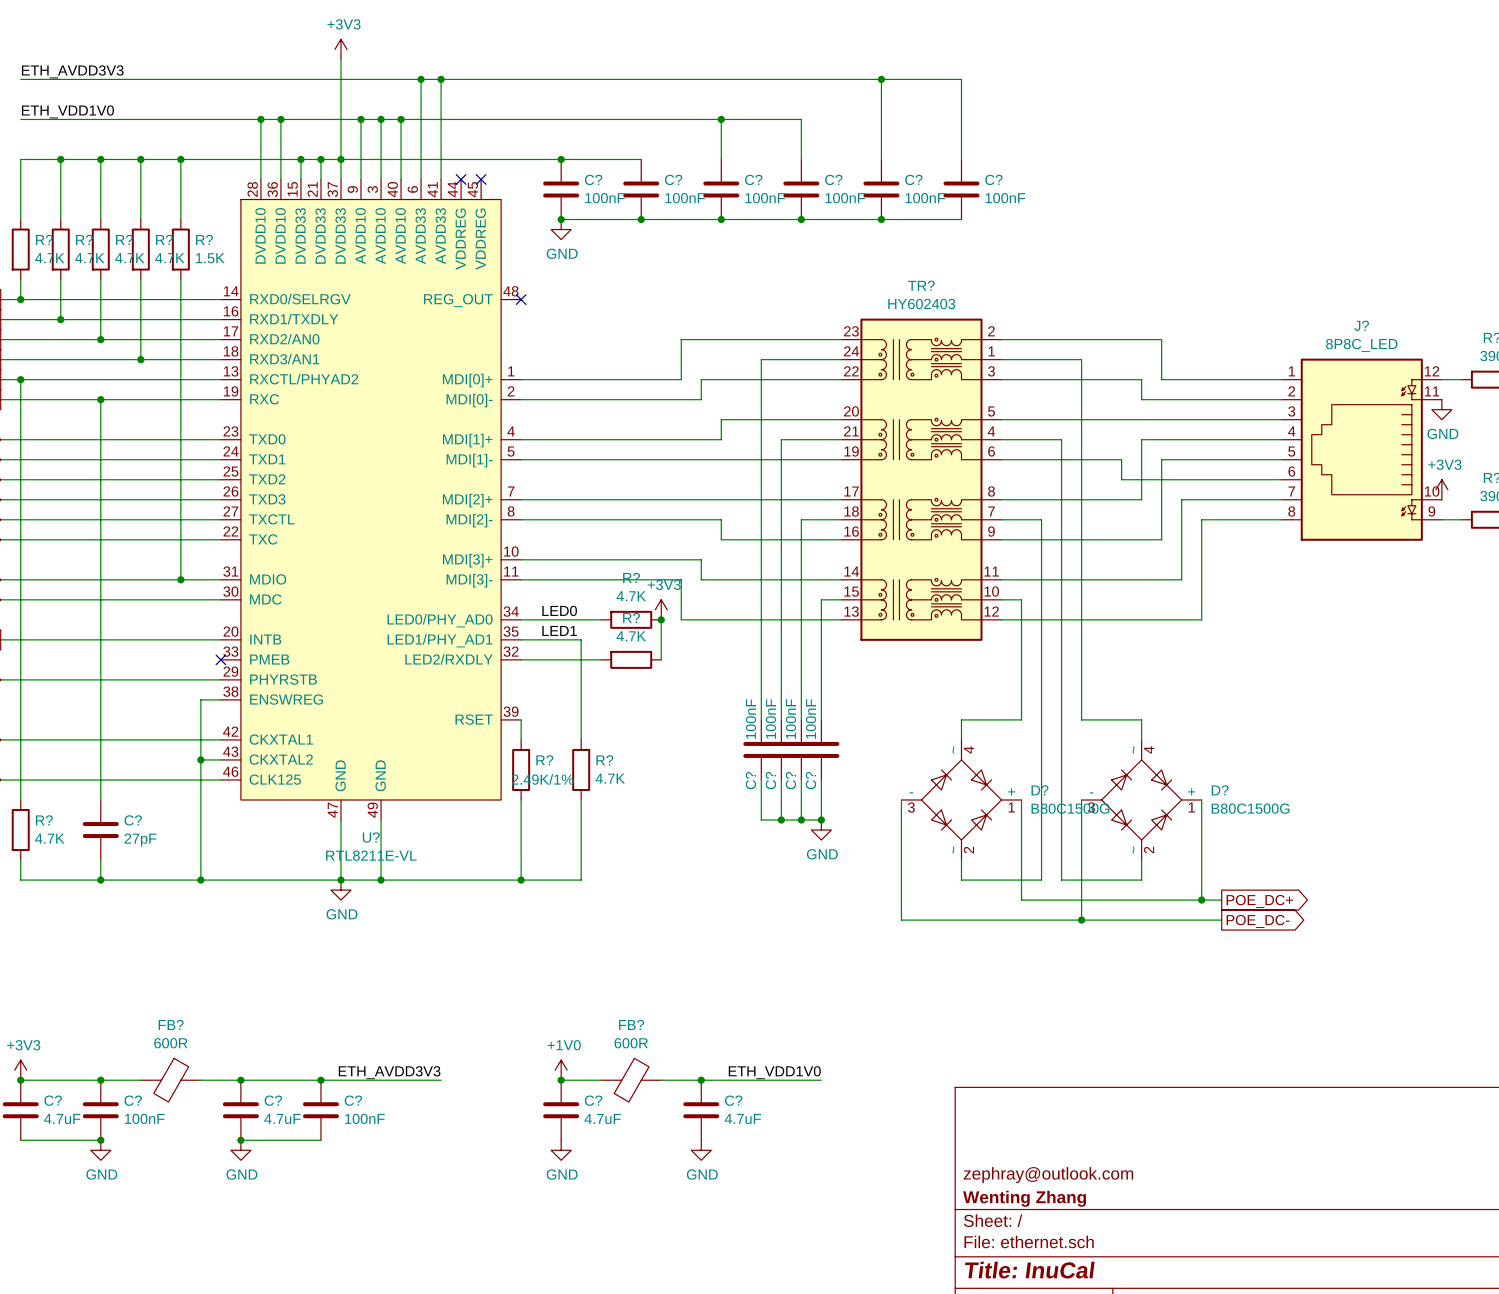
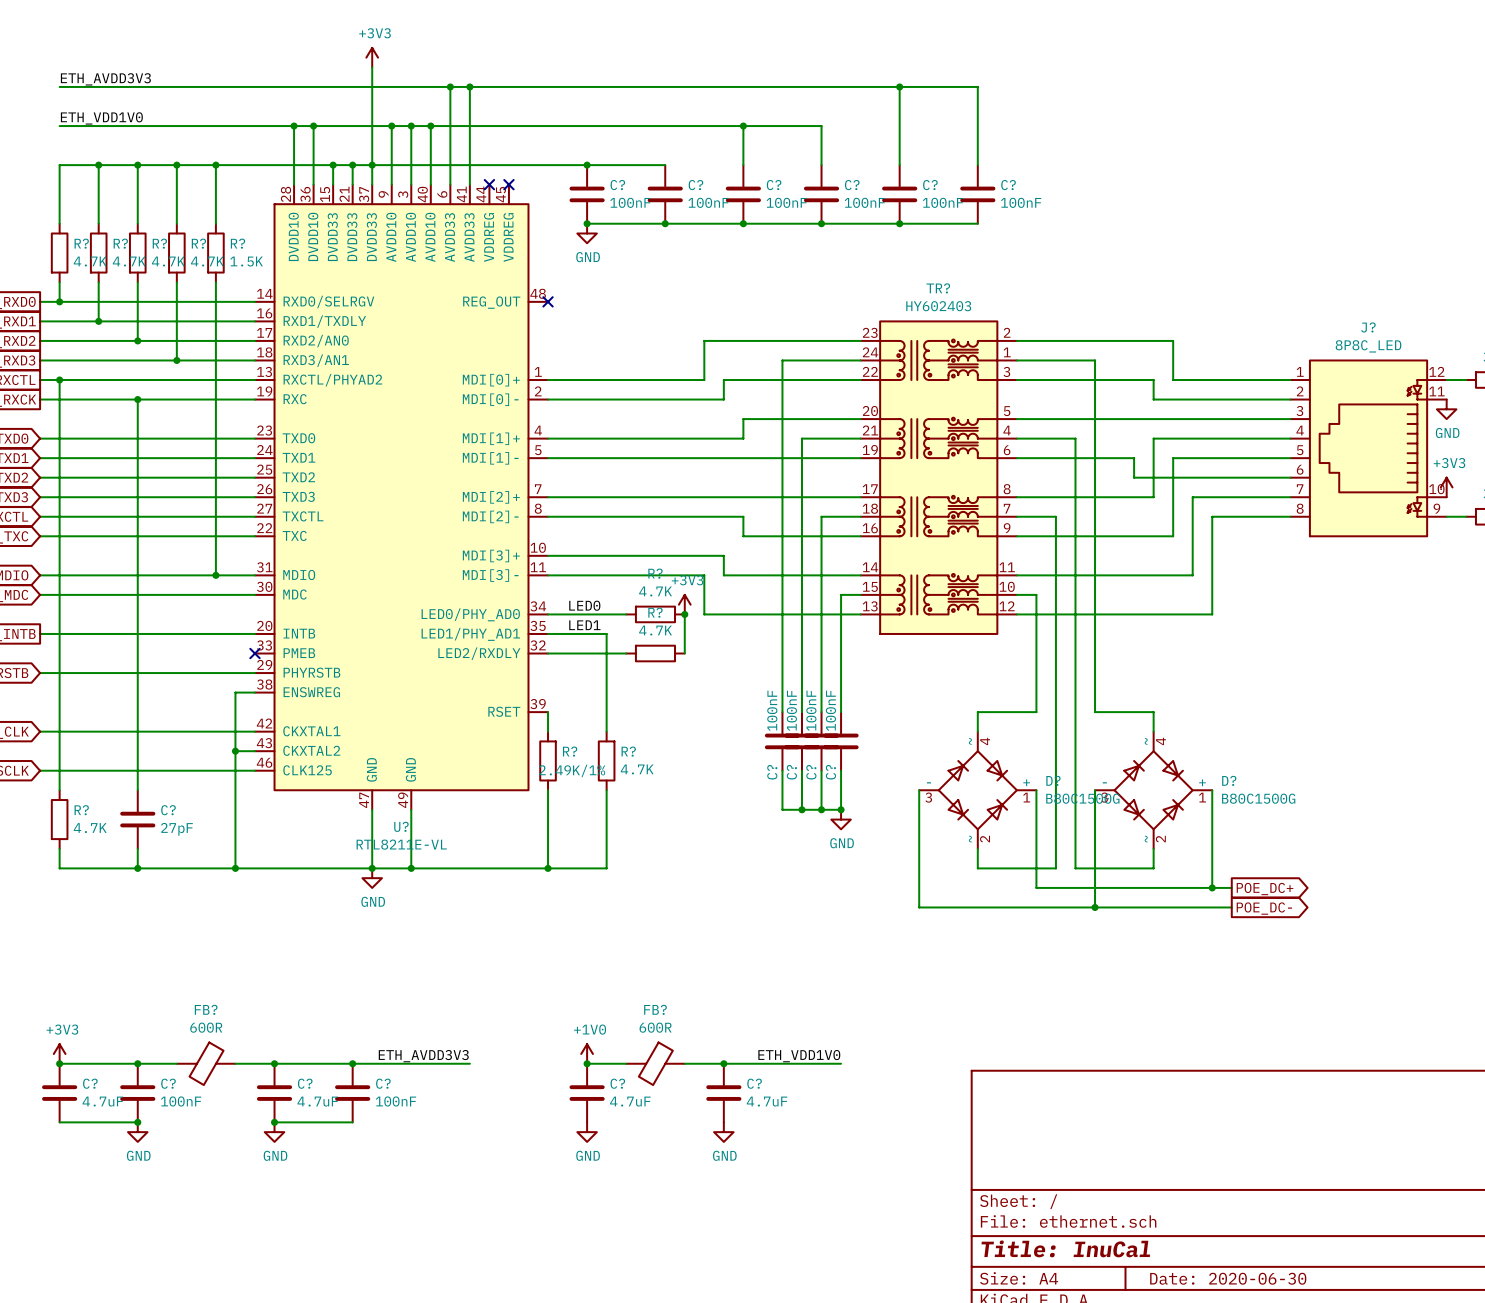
title block: zephray@outlook.com (1048, 1175) -> none
title block: Wenting Zhang (1024, 1198) -> none

